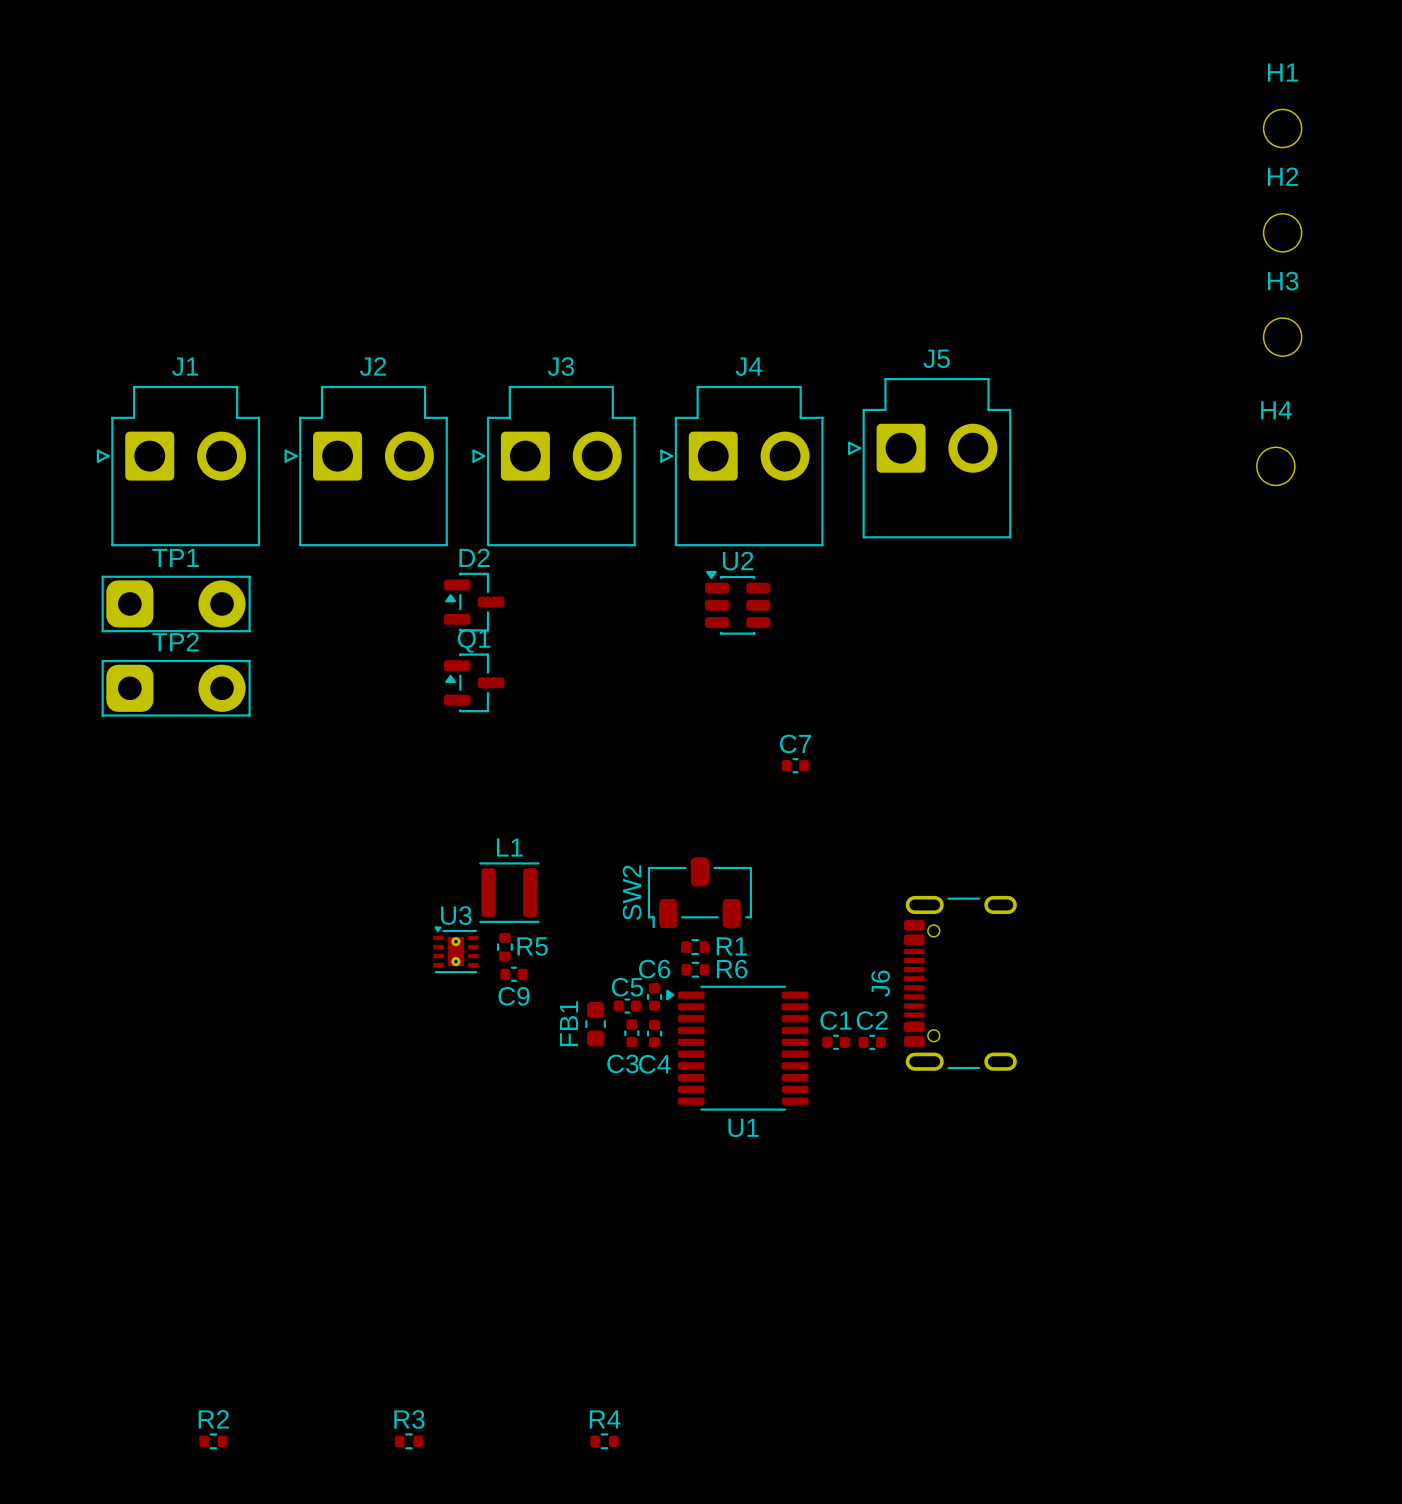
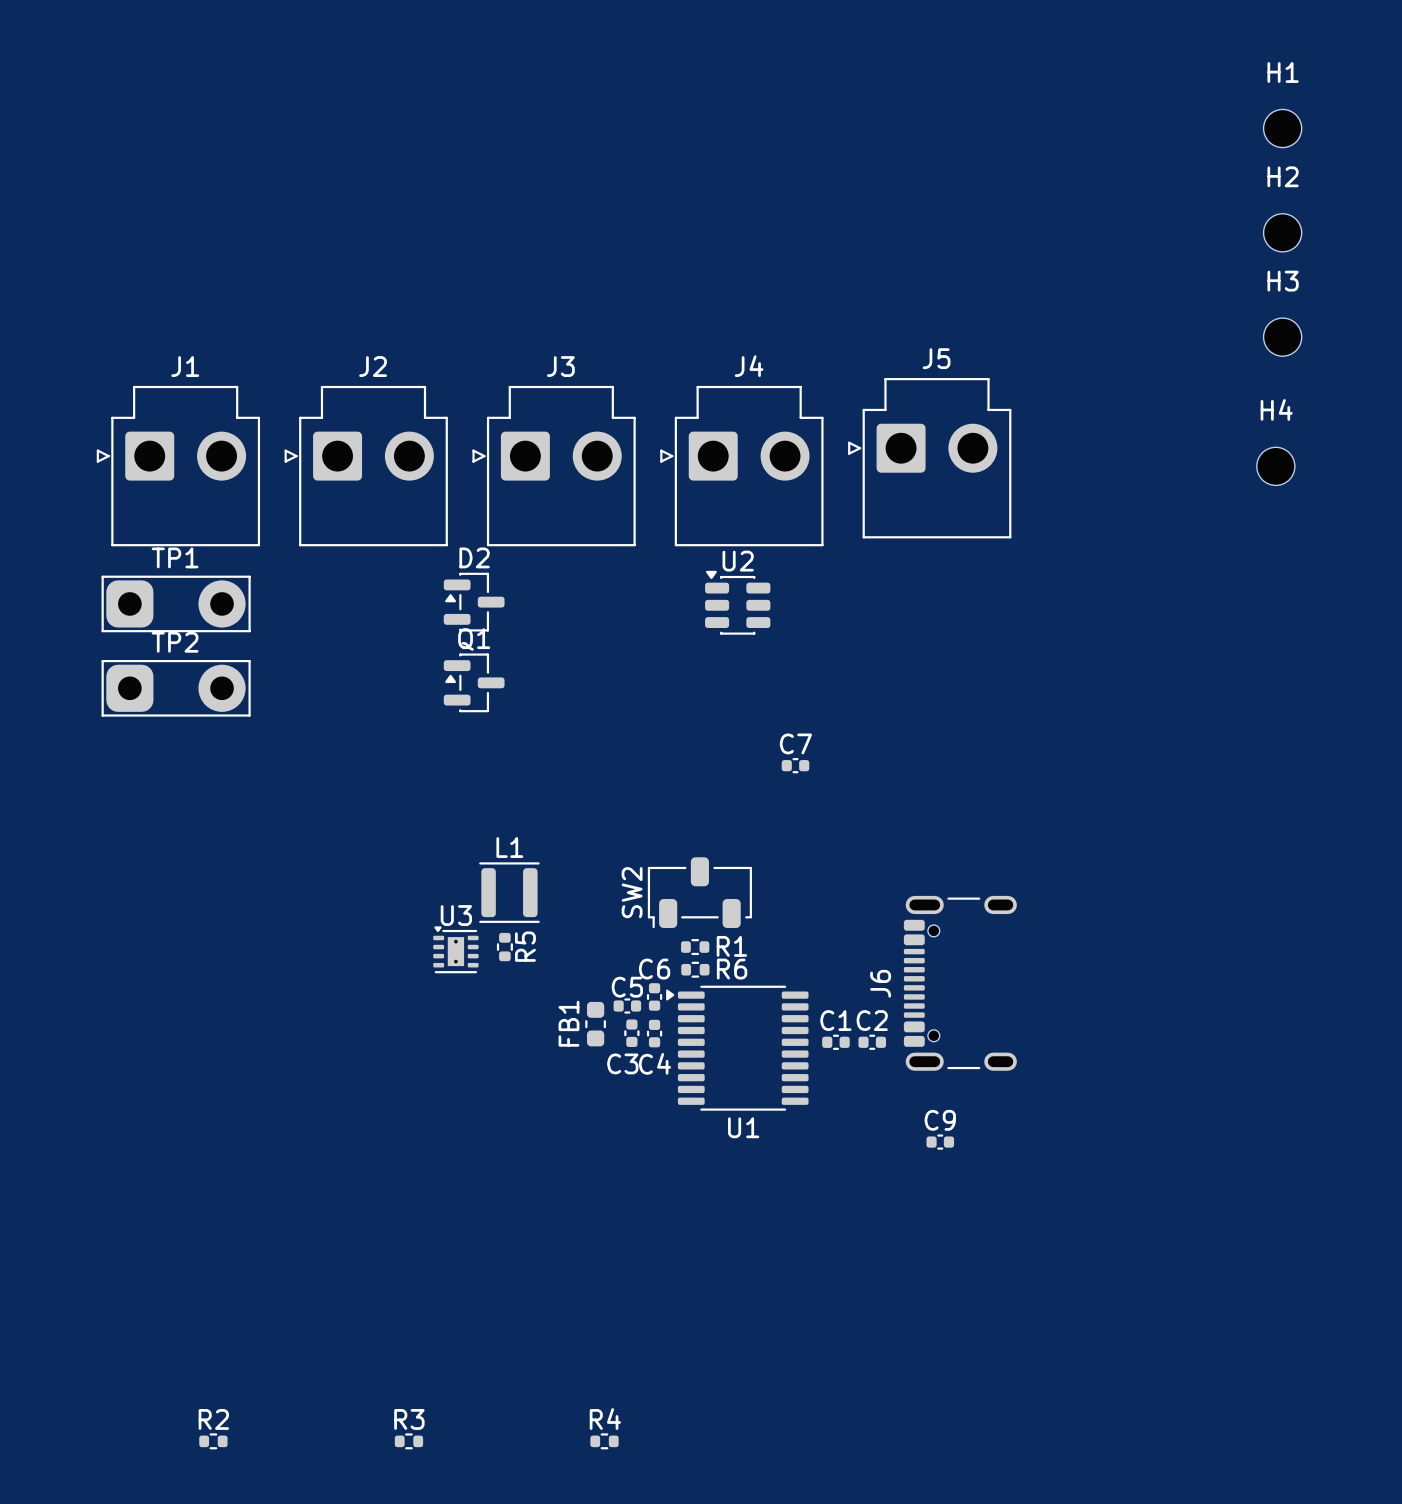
R5 name rotation: 0° (532, 946) -> 90° counterclockwise (525, 946)
C9 position: (513, 974) -> (940, 1142)
C9 name position: C9 (514, 996) -> C9 (940, 1120)

